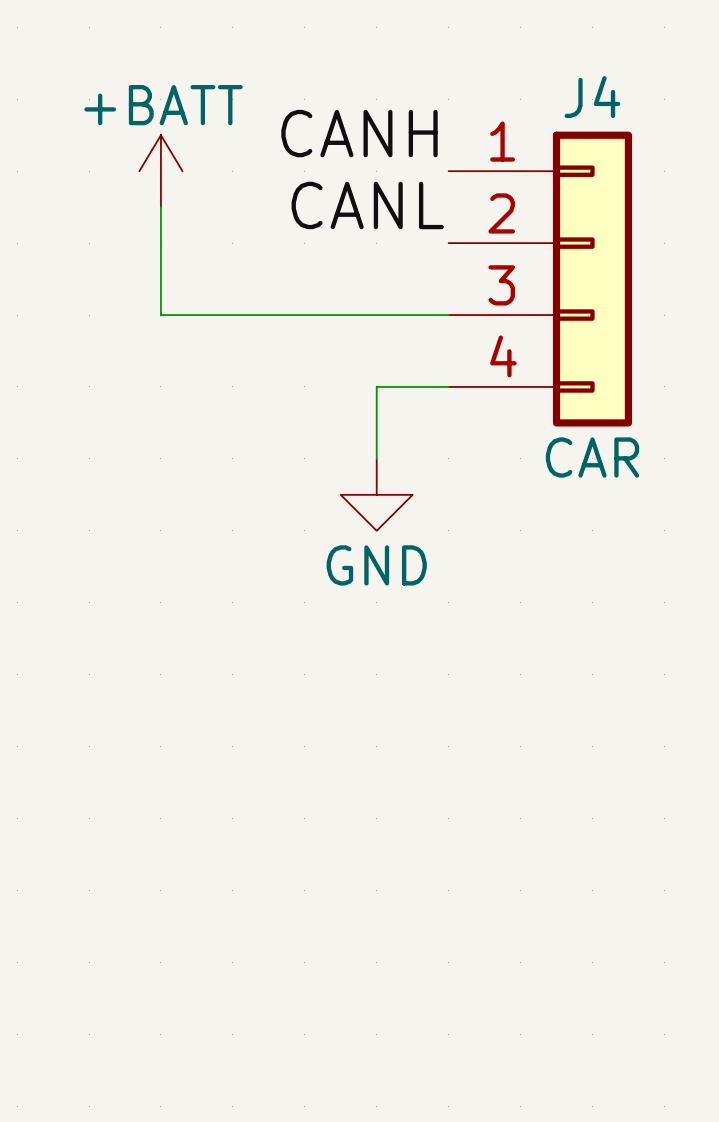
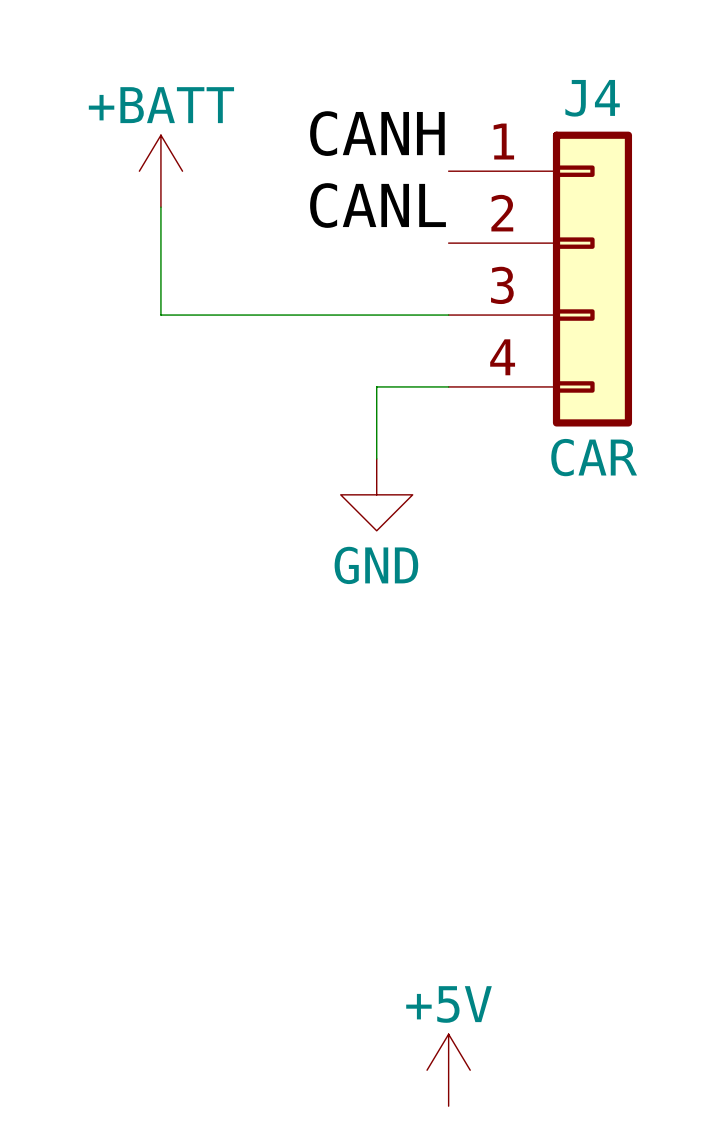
power symbol: none -> +5V (448, 1070)

